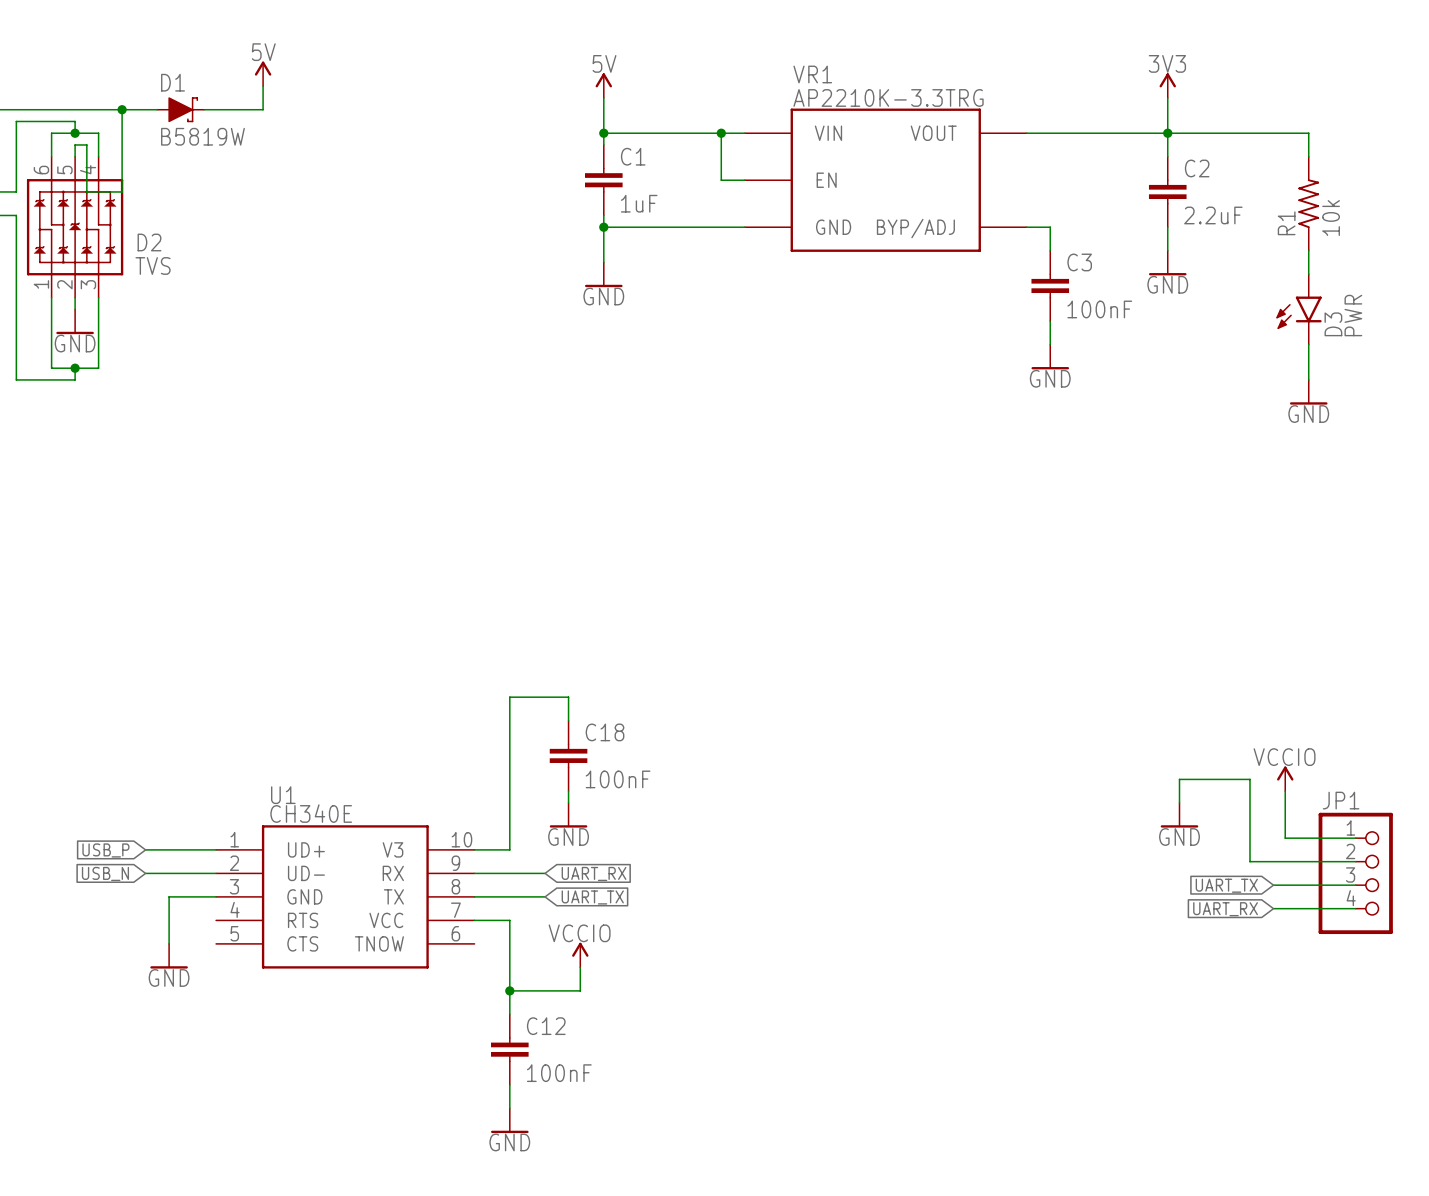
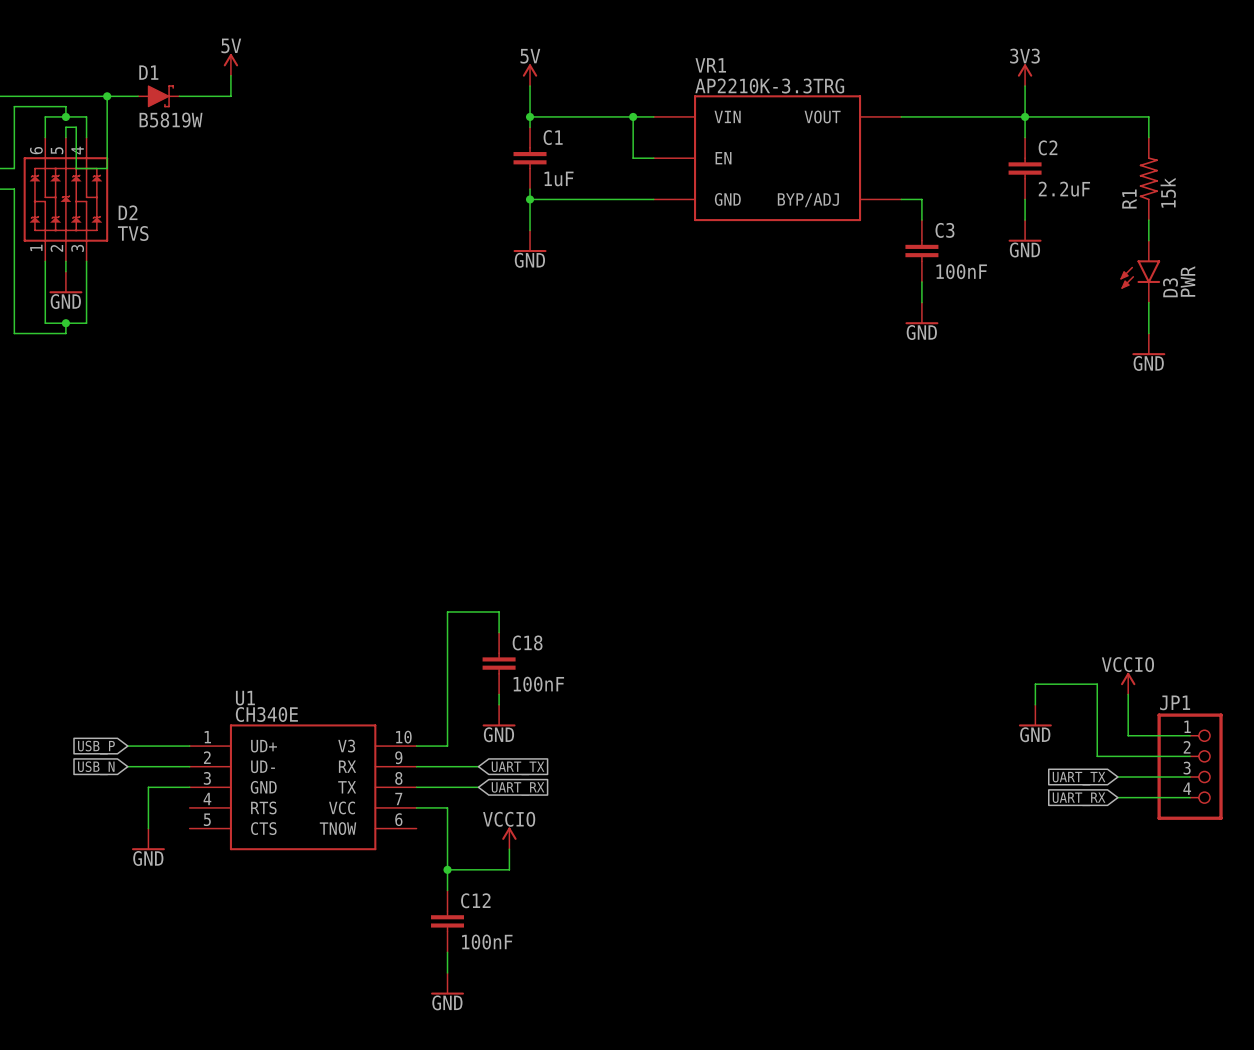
R1 value: 10k (1331, 218) -> 15k (1168, 192)
global label: UART_RX (594, 873) -> UART_TX (518, 768)
global label: UART_TX (592, 897) -> UART_RX (518, 788)

